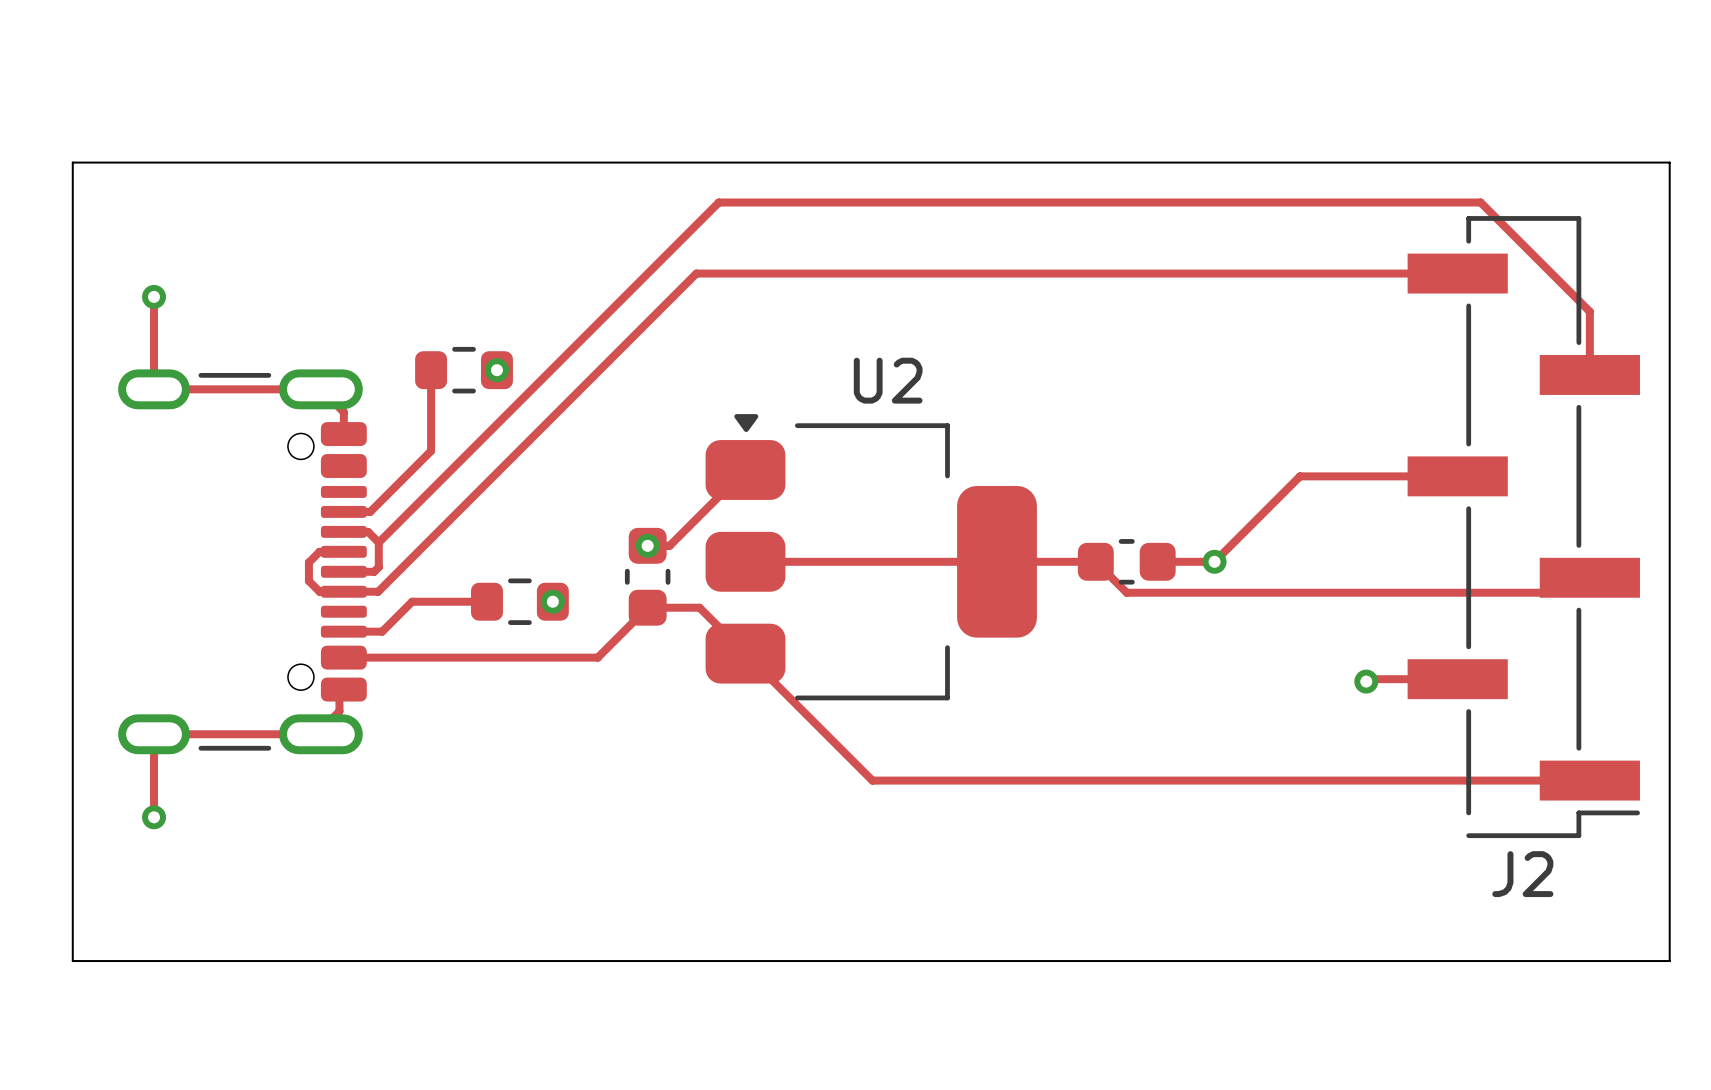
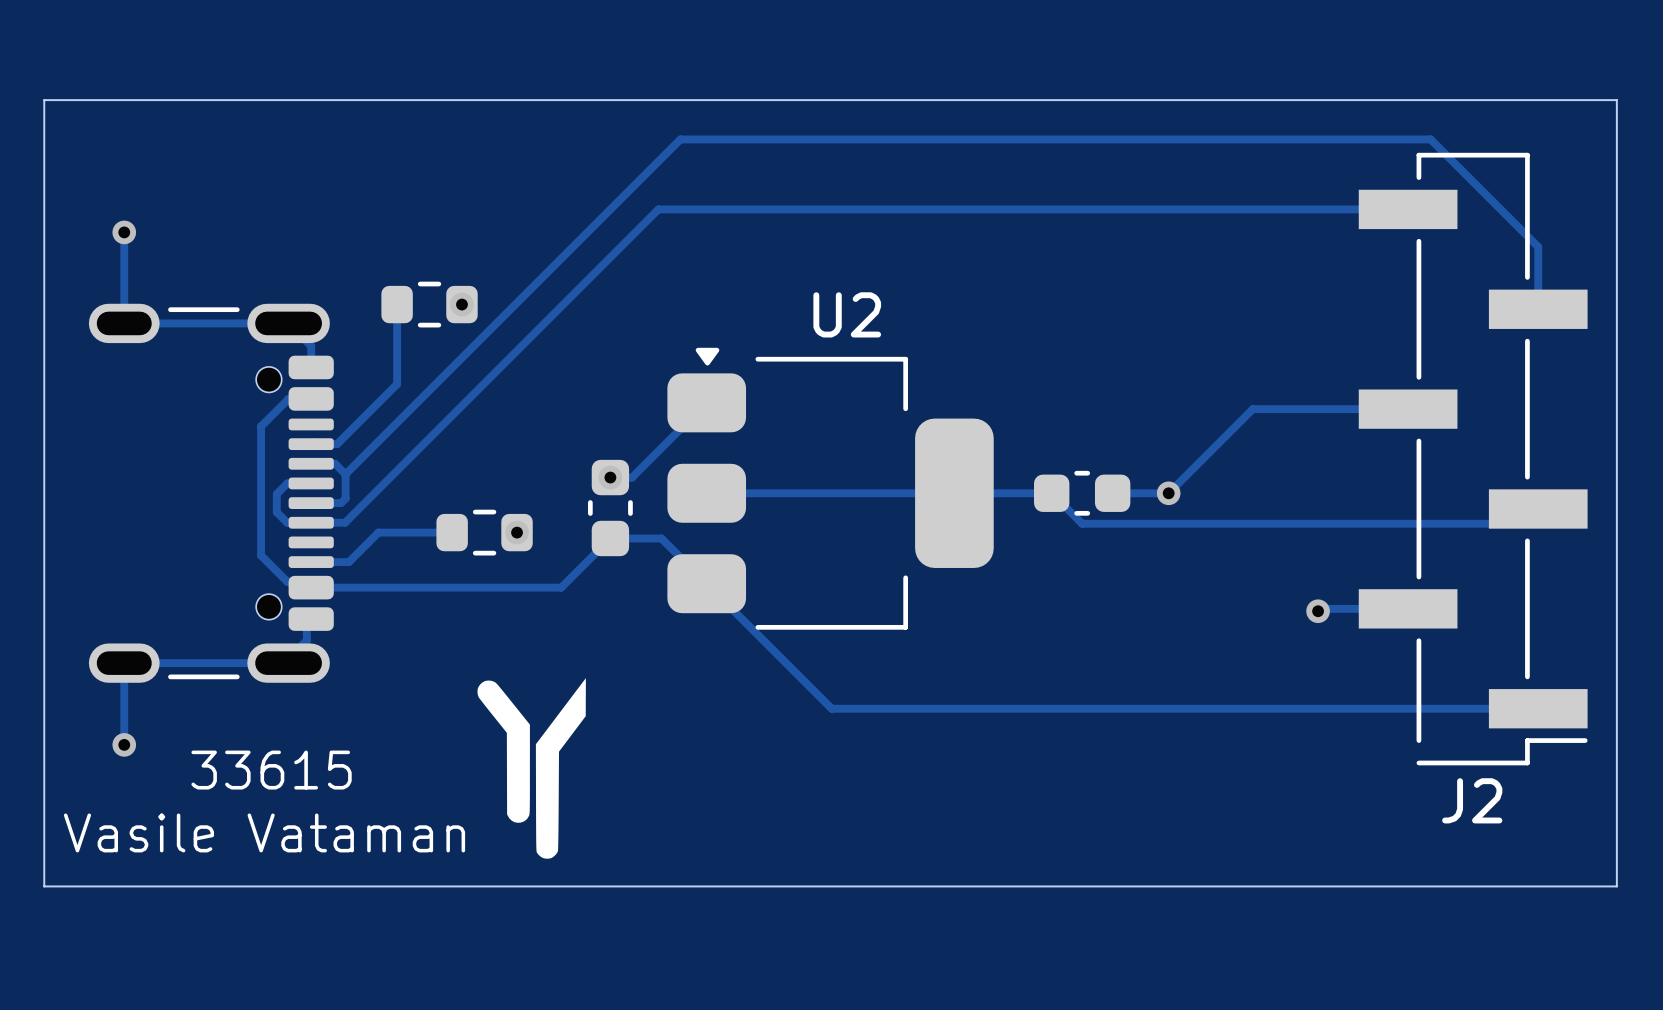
track: none -> (311, 398) (288, 398) (261, 426) (261, 555) (287, 581) (317, 581)
drawing: none -> [477, 678, 586, 859]
text: none -> 33615 (271, 770)
text: none -> Vasile Vataman (264, 832)

